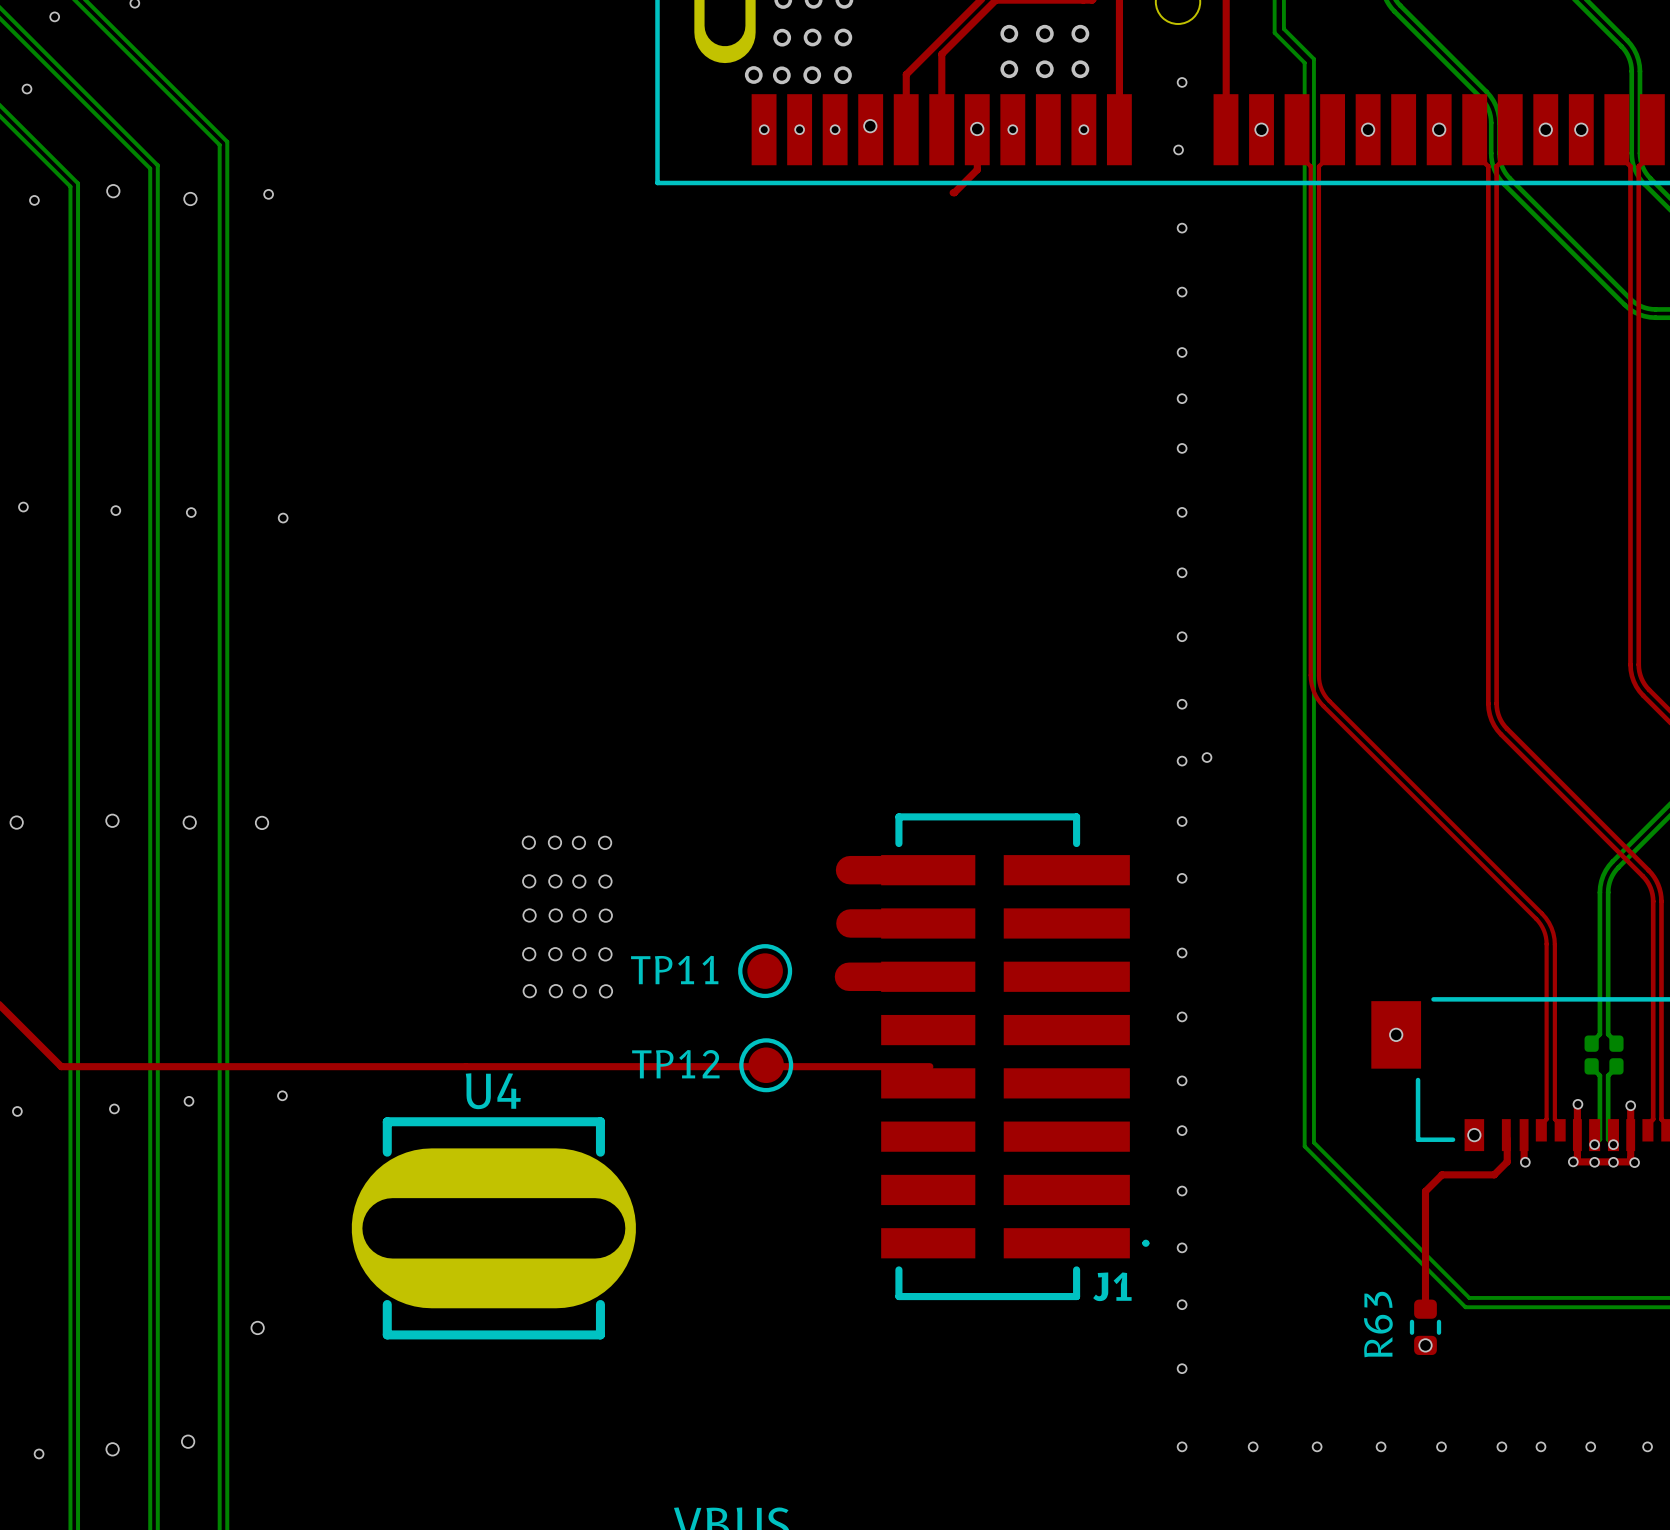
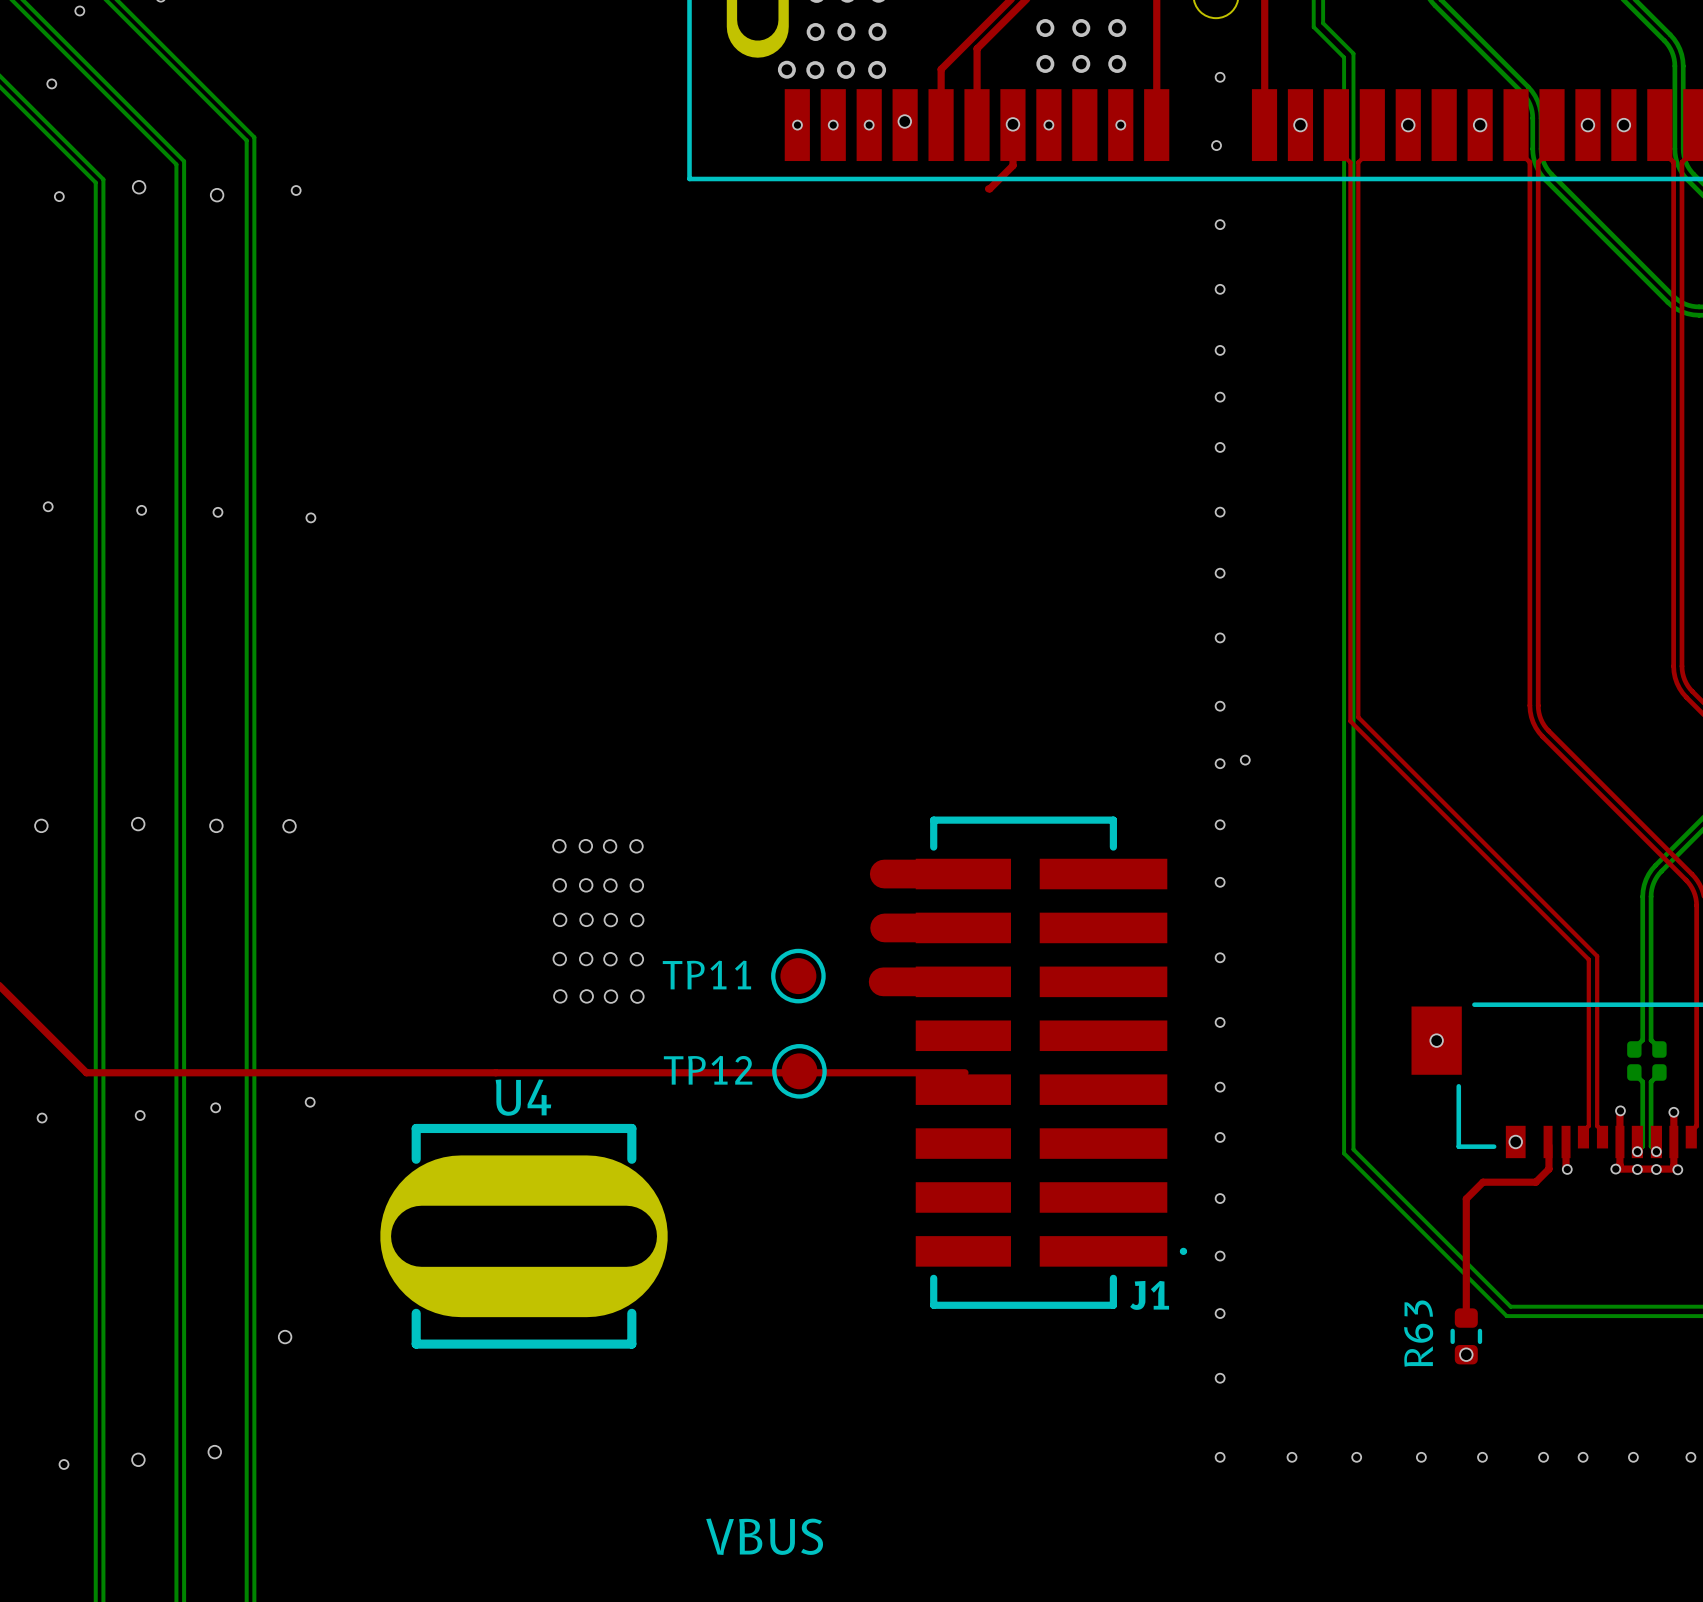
top track: (1310, 166) (1310, 675) (1312, 687) (1323, 706) (1538, 921) (1545, 937) (1546, 954) -> (1350, 162) (1350, 721) (1588, 959)
top track: (1318, 166) (1320, 686) (1329, 701) (1542, 913) (1551, 927) (1554, 951) -> (1358, 162) (1358, 717) (1597, 956)

